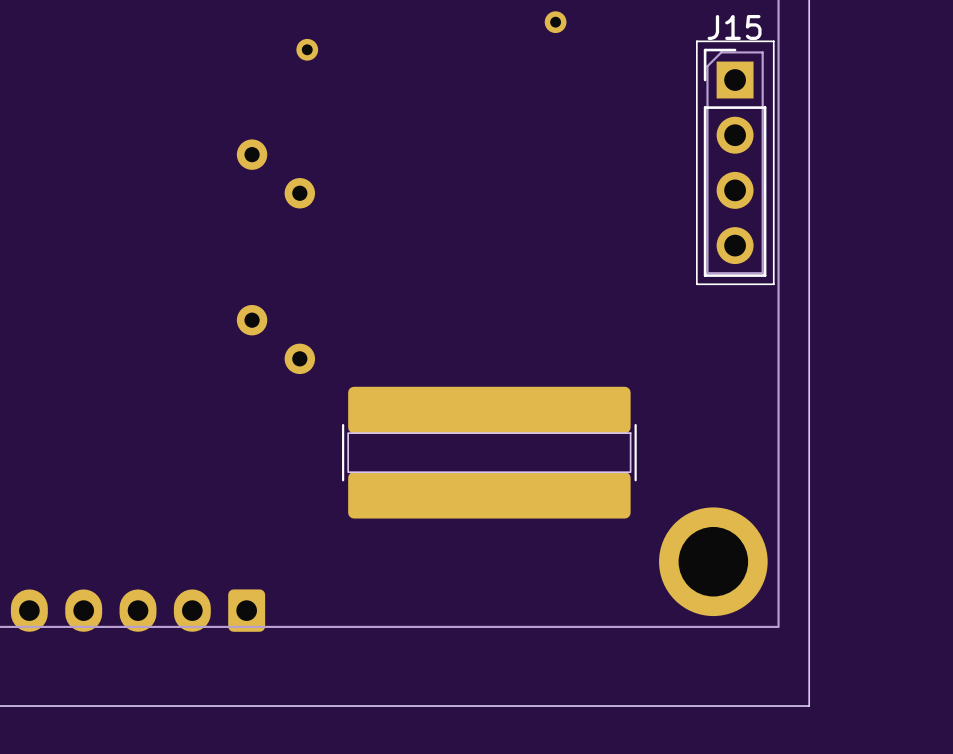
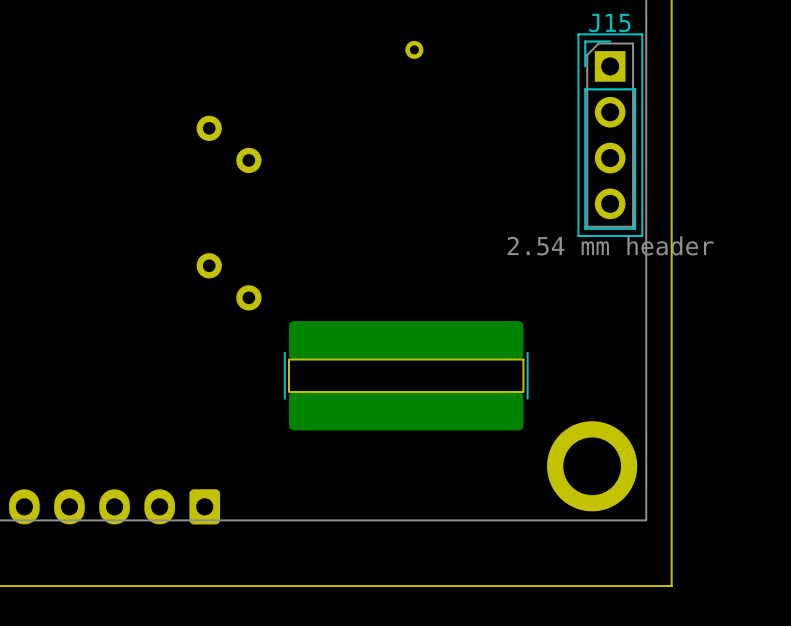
part: (555, 22) -> none
part: (307, 49) -> none
part: none -> (414, 49)
J15 value: none -> 2.54 mm header (610, 245)

